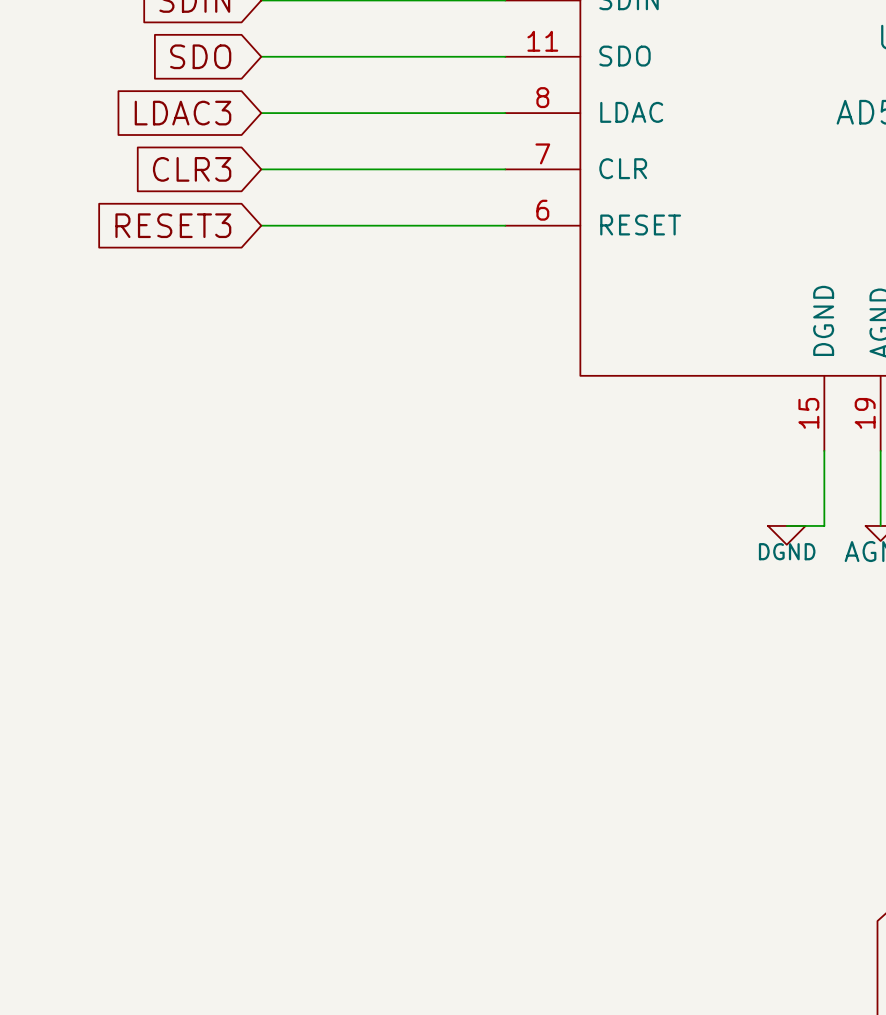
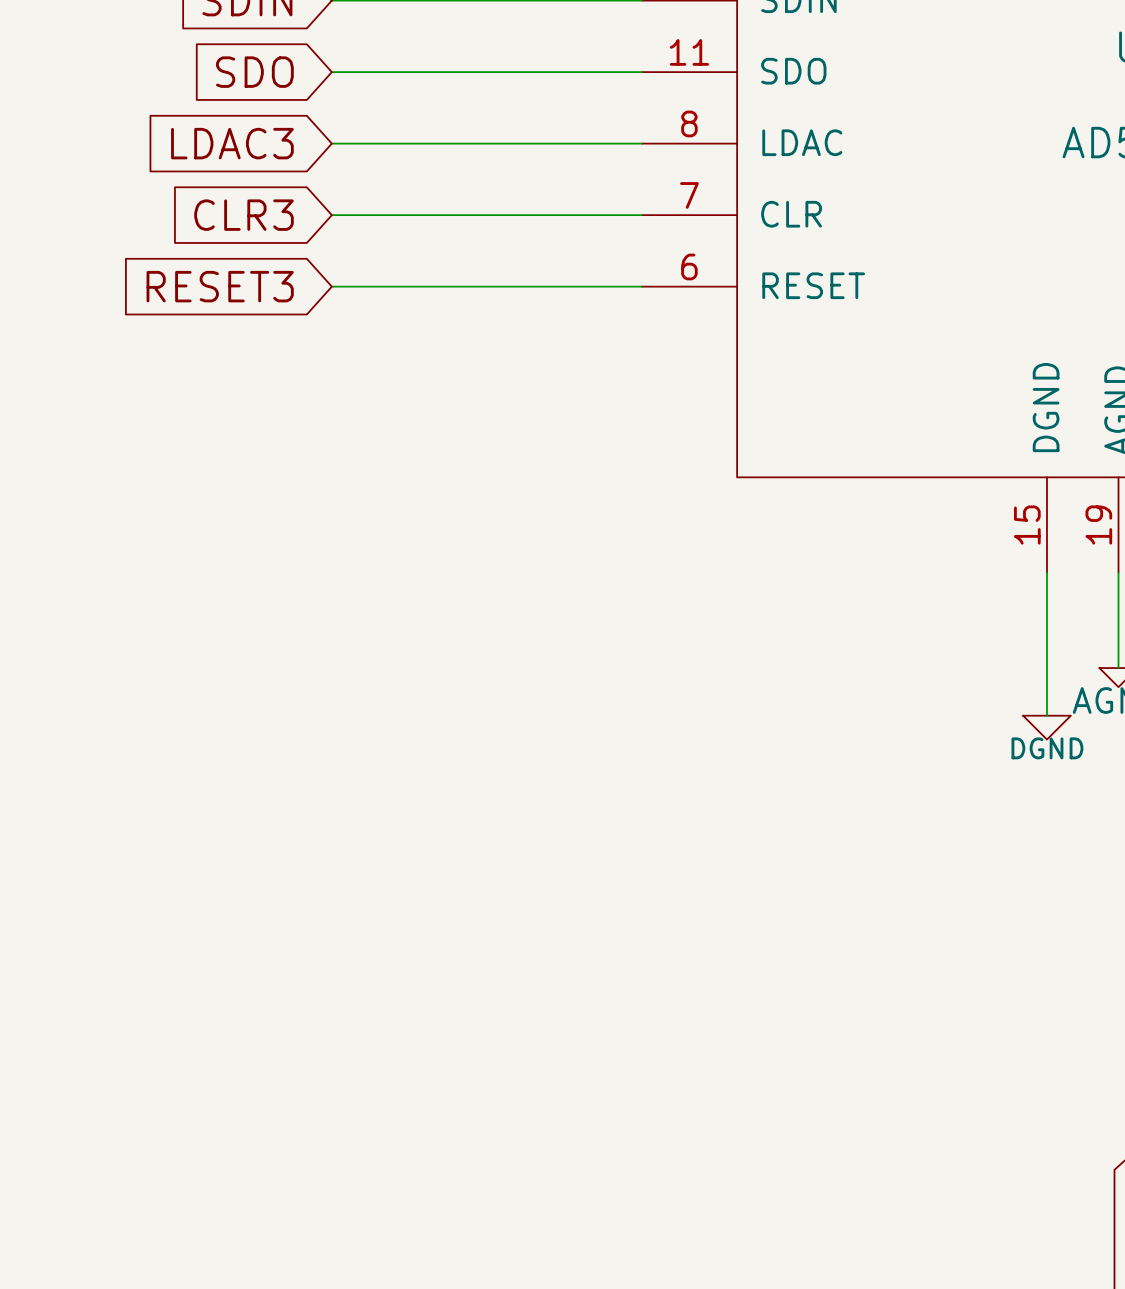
wire: (786, 525) (824, 525) -> (1046, 715) (1046, 668)
power symbol position: DGND (786, 535) -> DGND (1046, 727)

